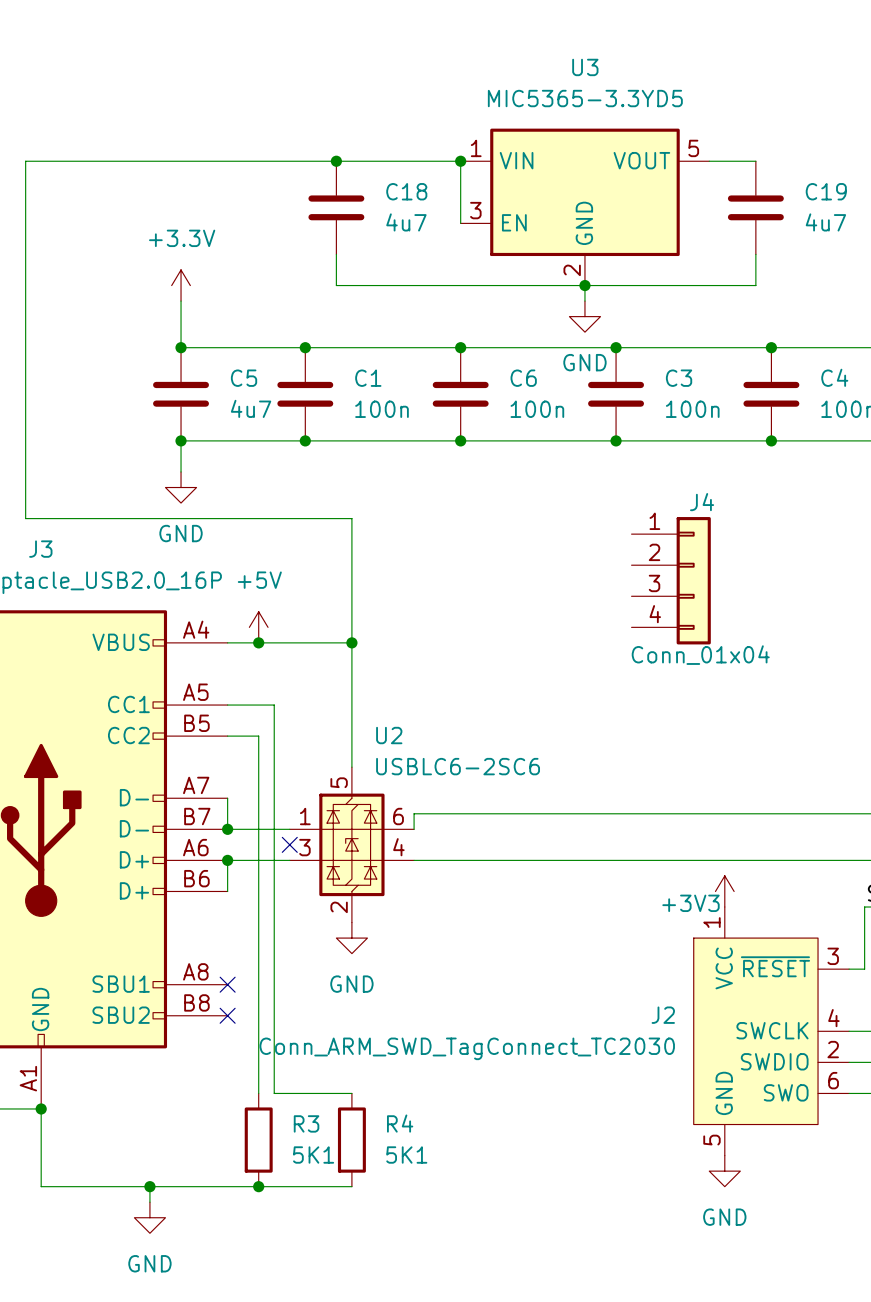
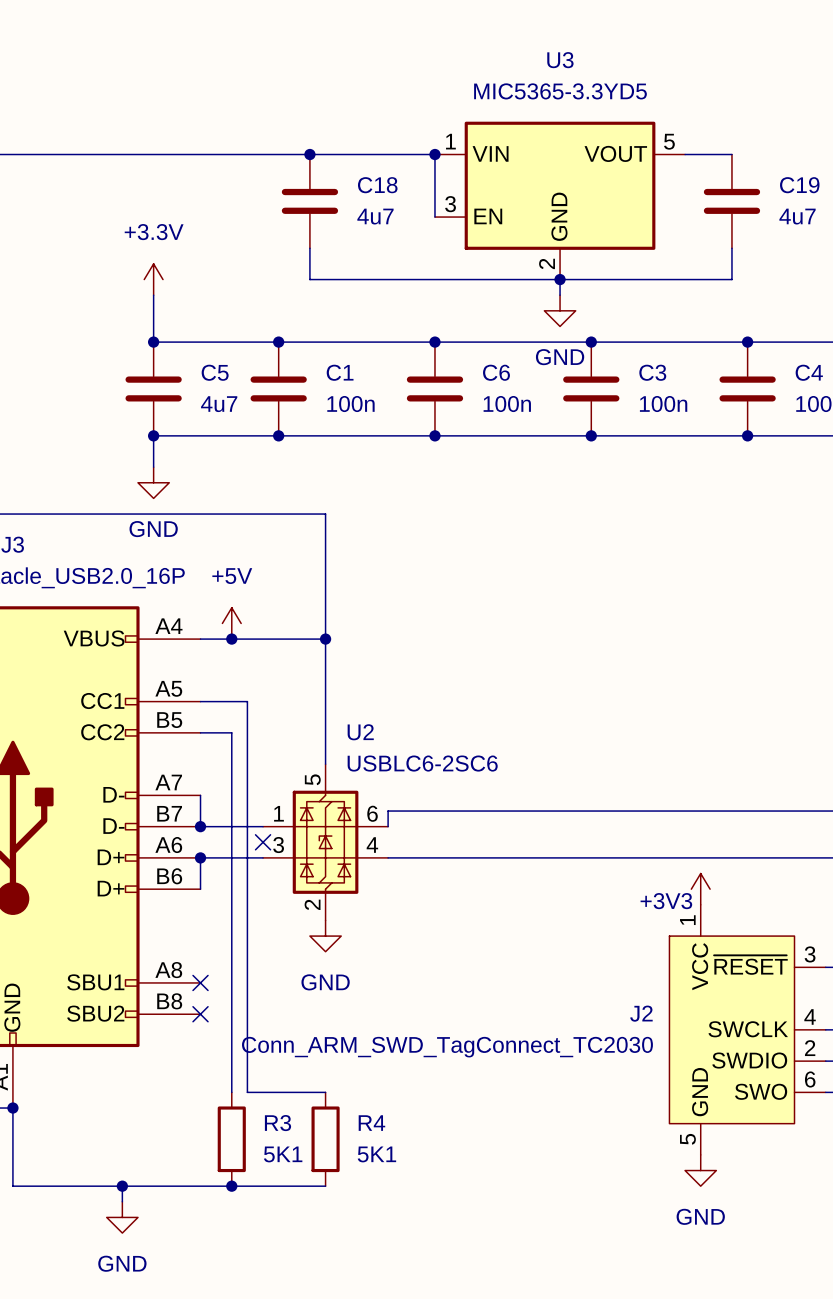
J4: Conn_01x04 (671, 580) -> none

